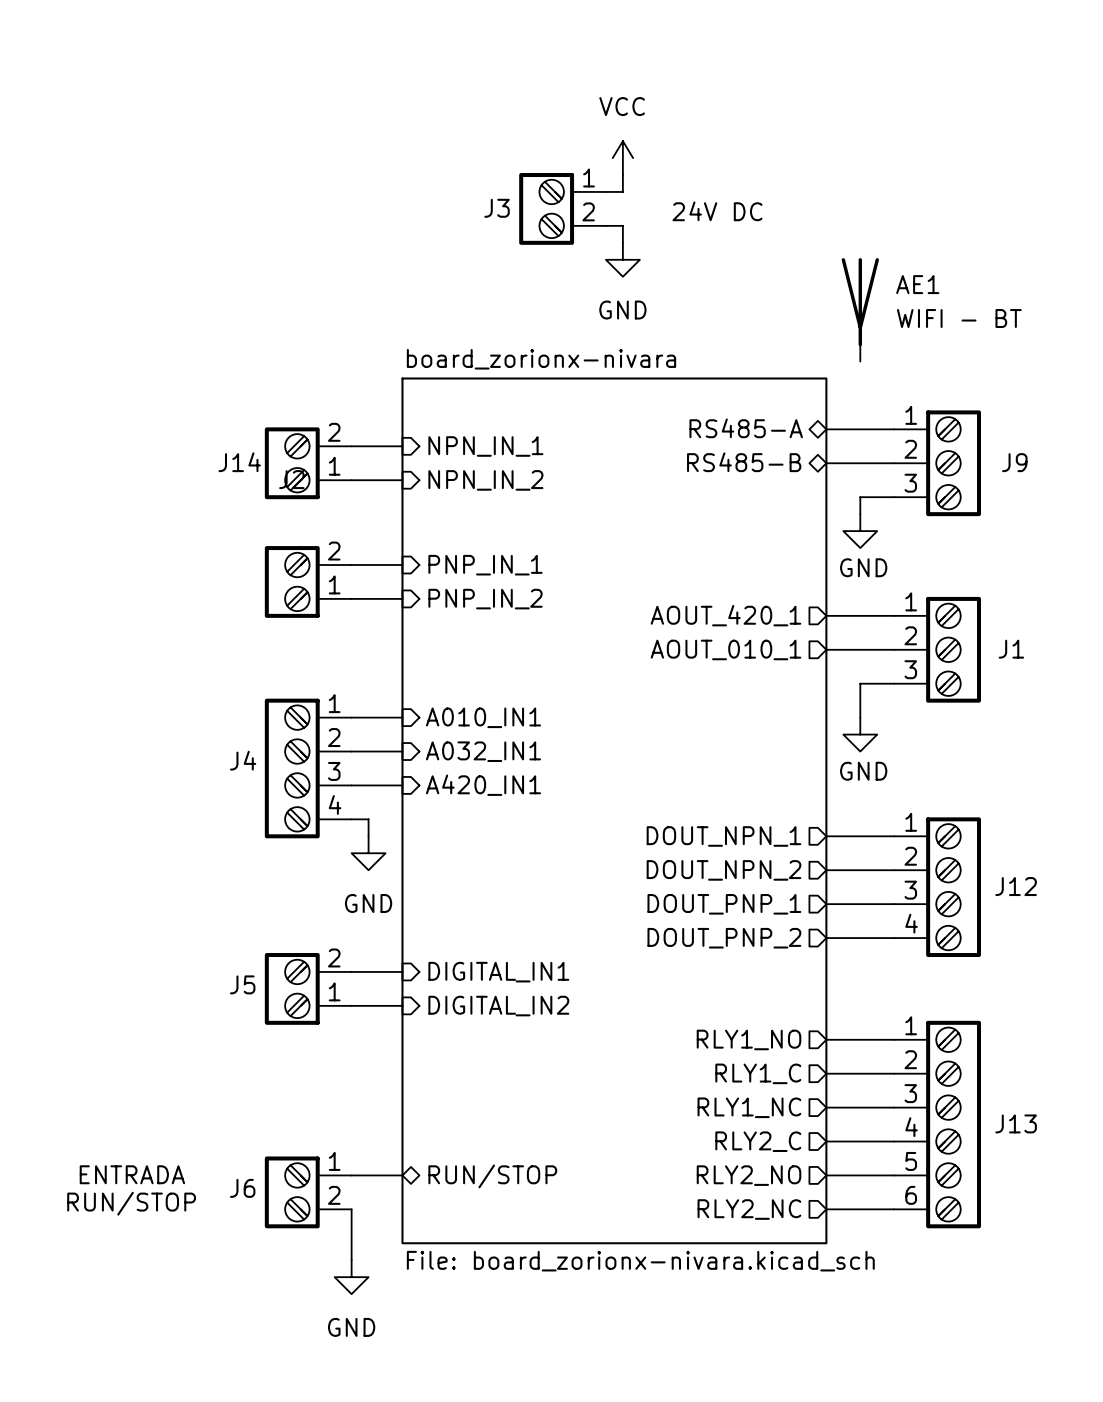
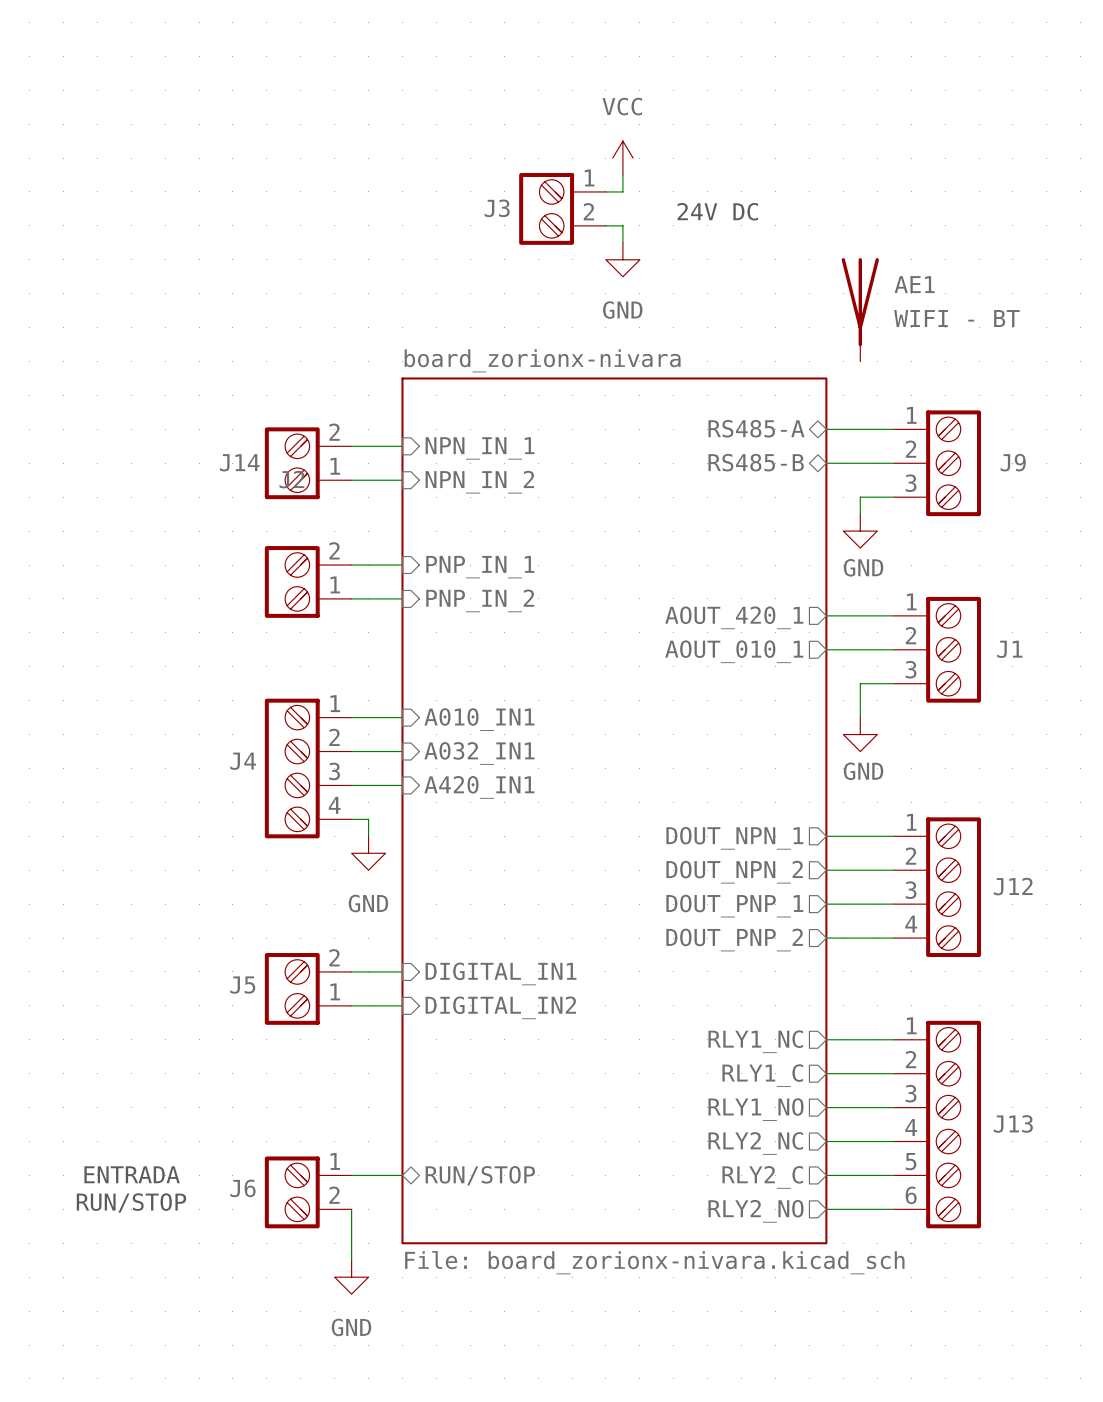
sheet pin: RLY1_NO (749, 1039) -> RLY1_NC (755, 1041)
sheet pin: RLY1_NC (749, 1107) -> RLY1_NO (756, 1109)
sheet pin: RLY2_C (758, 1141) -> RLY2_NC (755, 1143)
sheet pin: RLY2_NO (749, 1175) -> RLY2_C (762, 1177)
sheet pin: RLY2_NC (749, 1209) -> RLY2_NO (756, 1211)

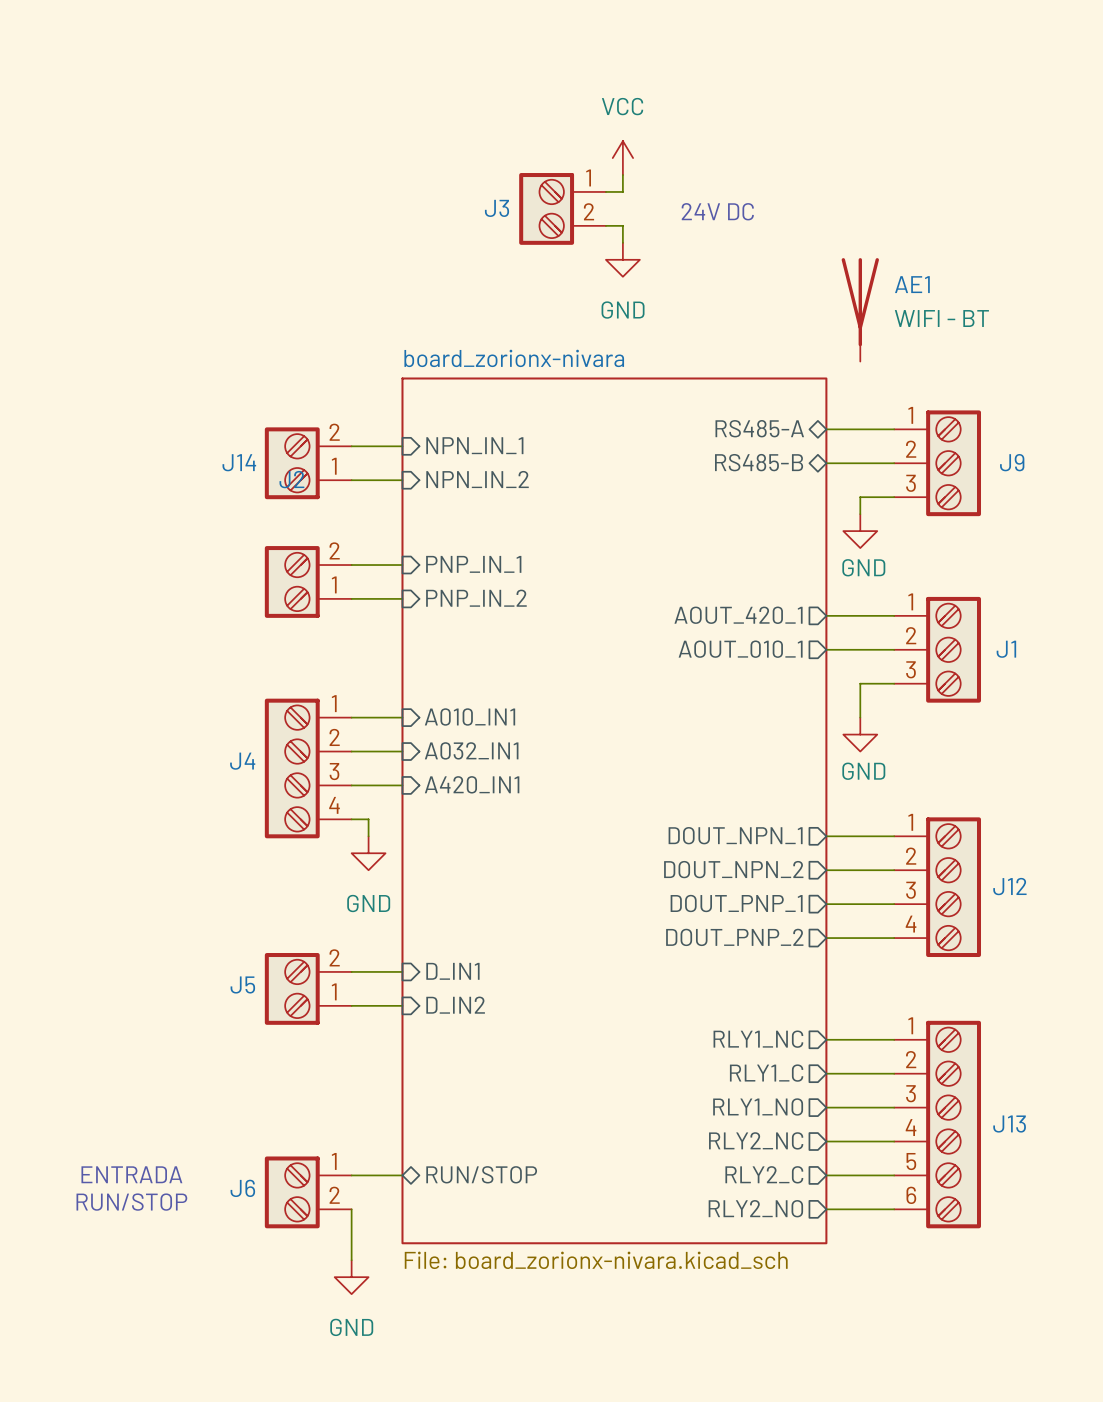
sheet pin: DIGITAL_IN1 (501, 973) -> D_IN1 (452, 971)
sheet pin: DIGITAL_IN2 (500, 1007) -> D_IN2 (455, 1005)

